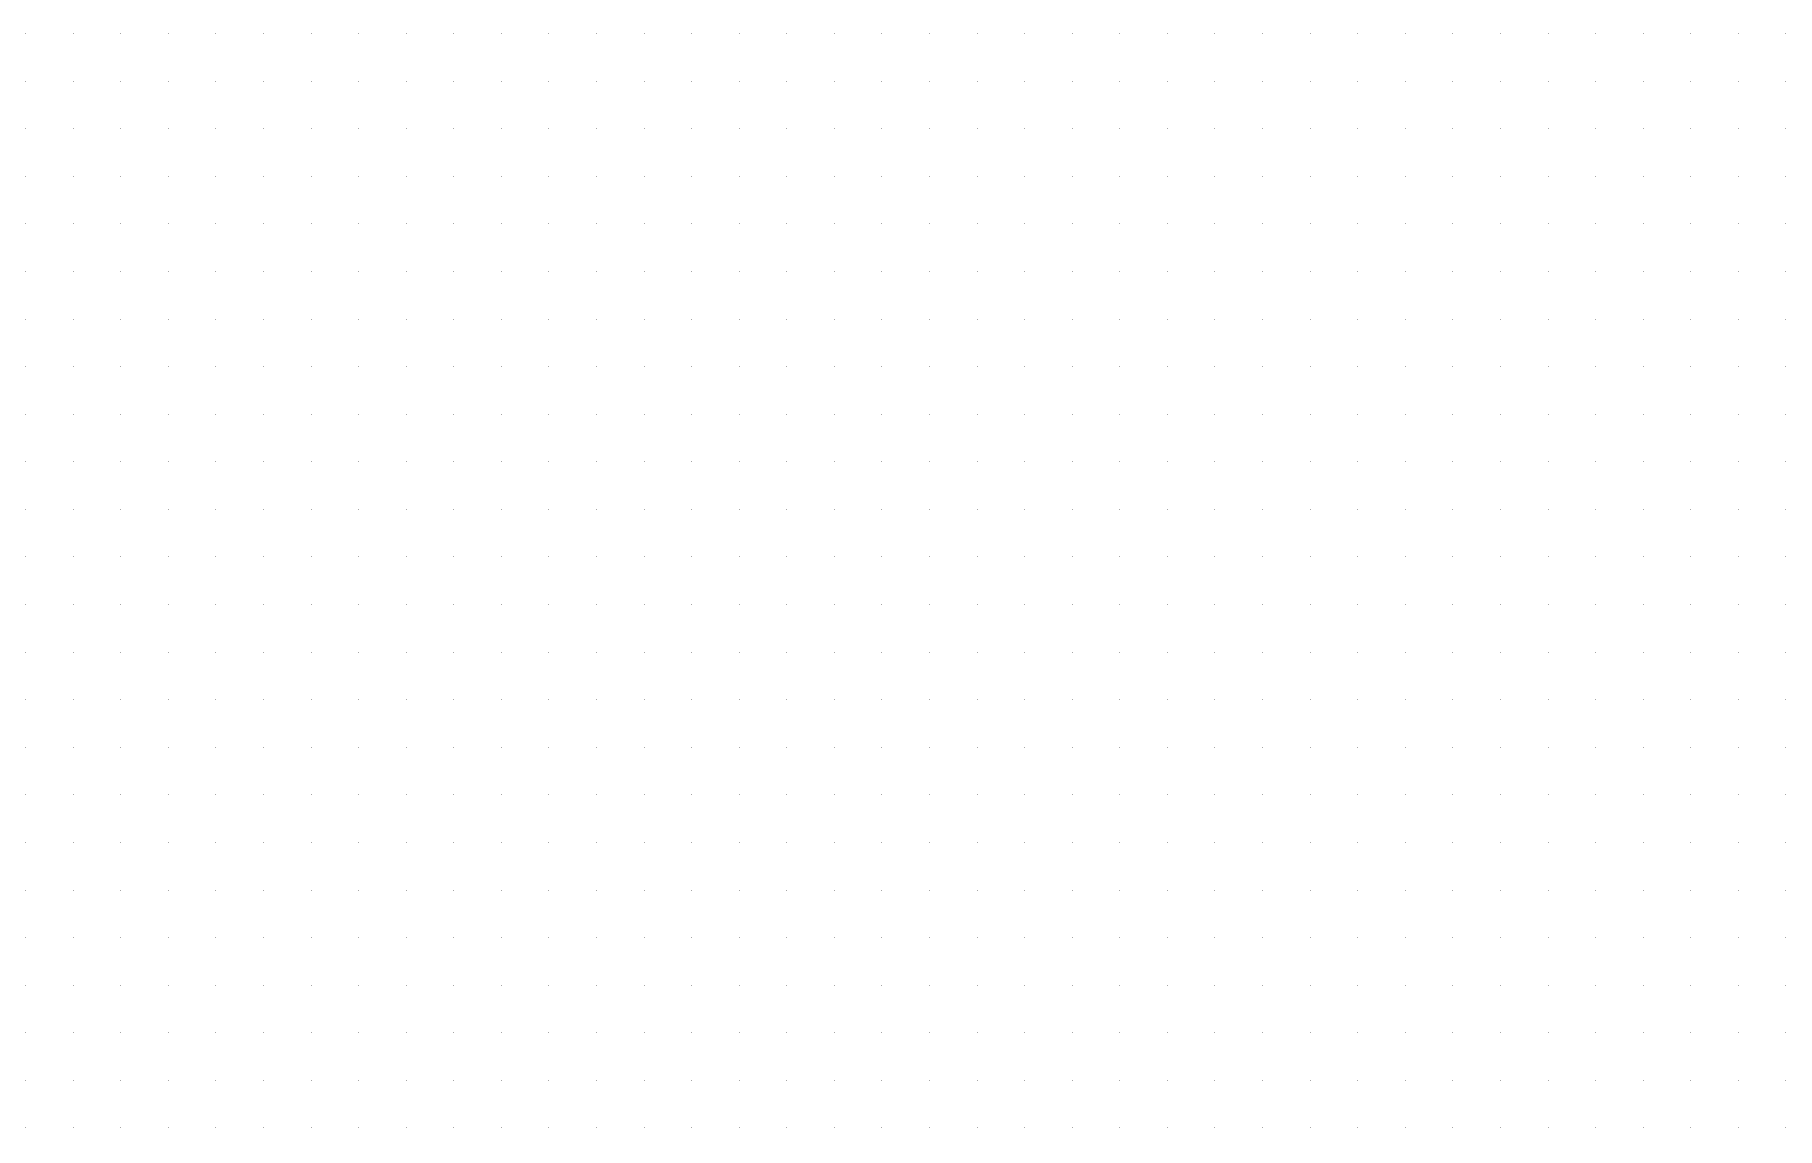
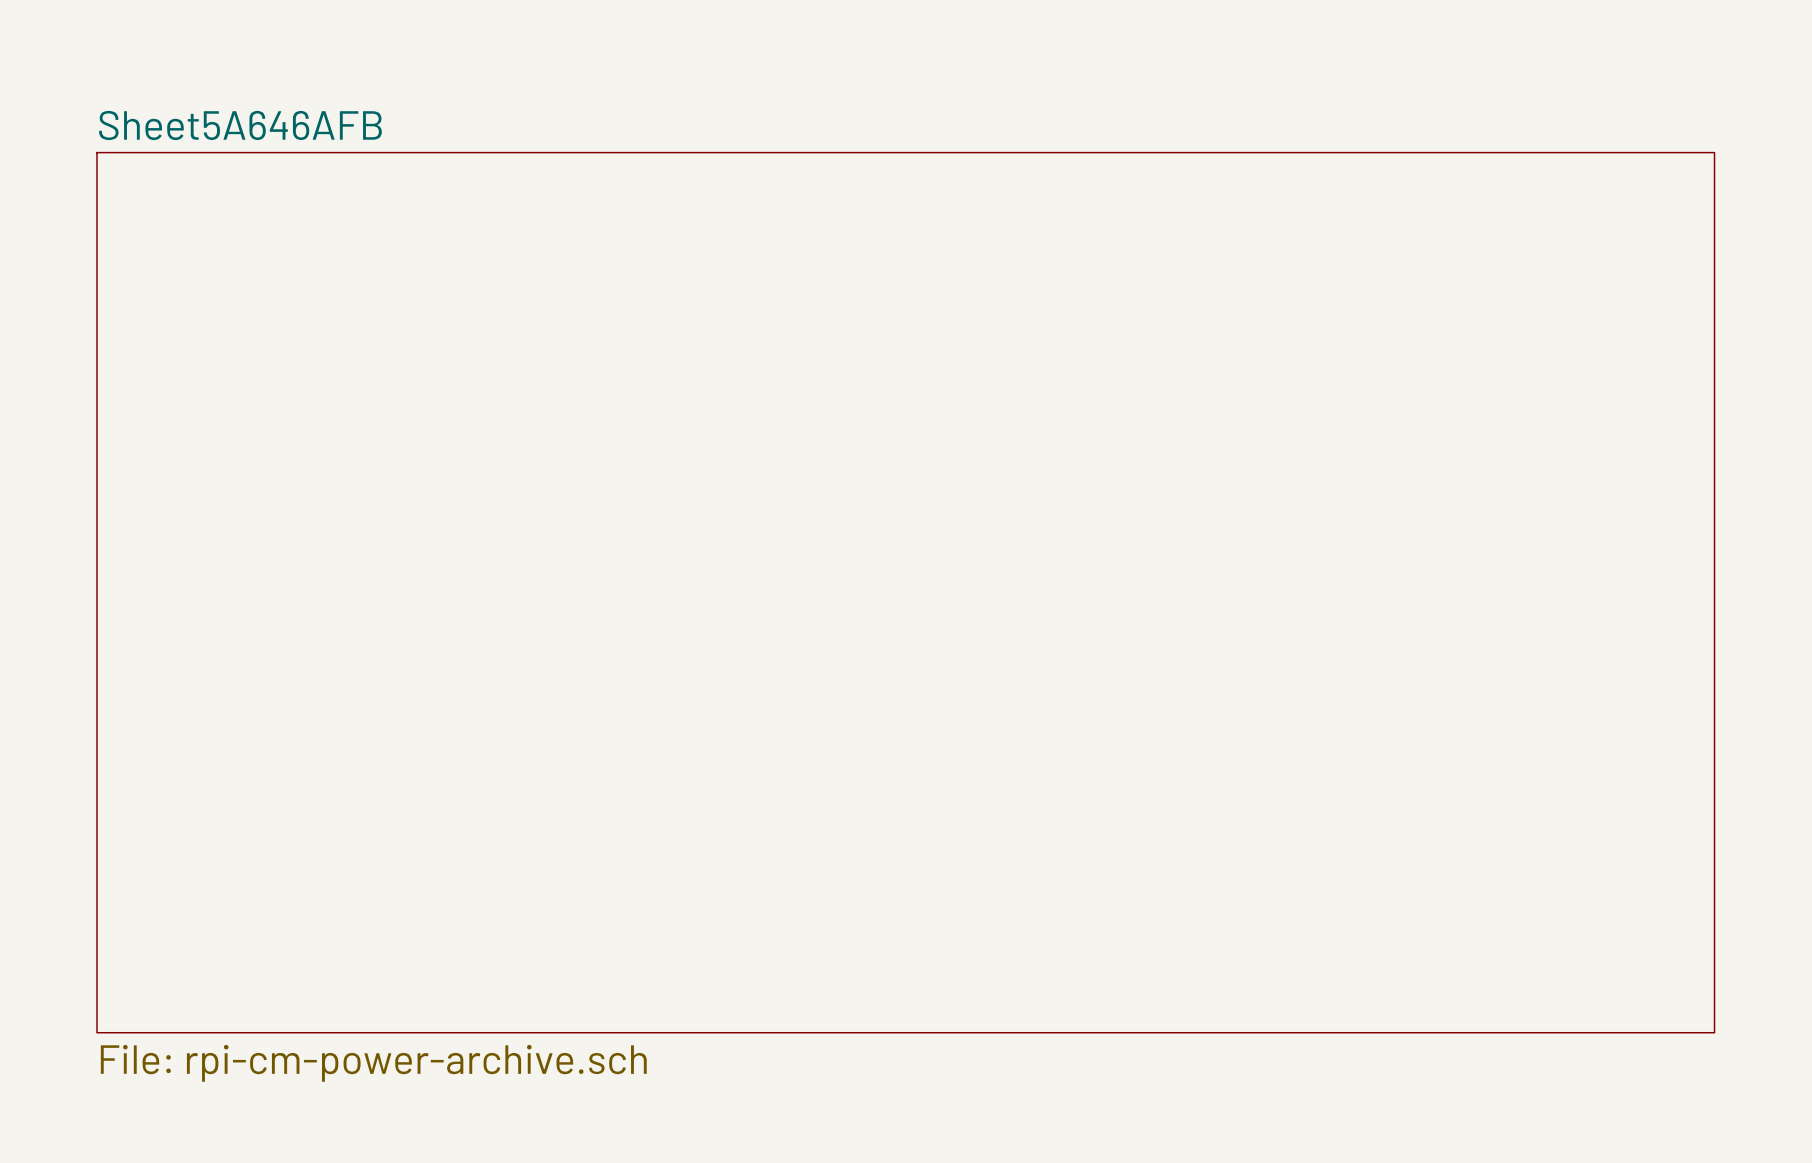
sheet Sheet5A646AFB: none -> File: rpi-cm-power-archive.sch (905, 592)

